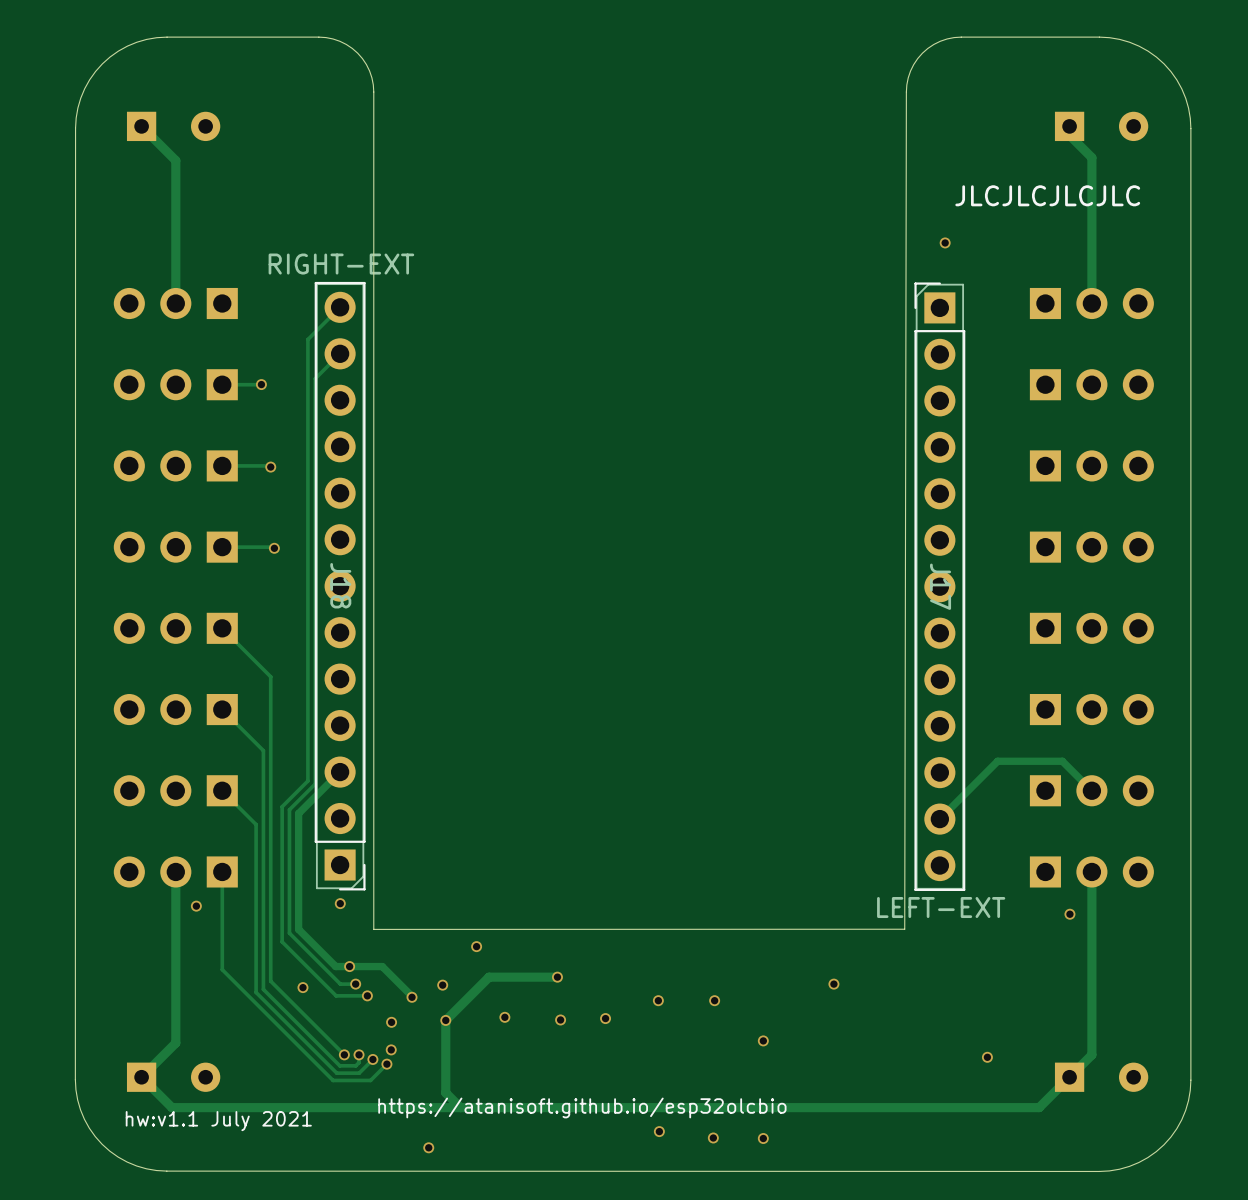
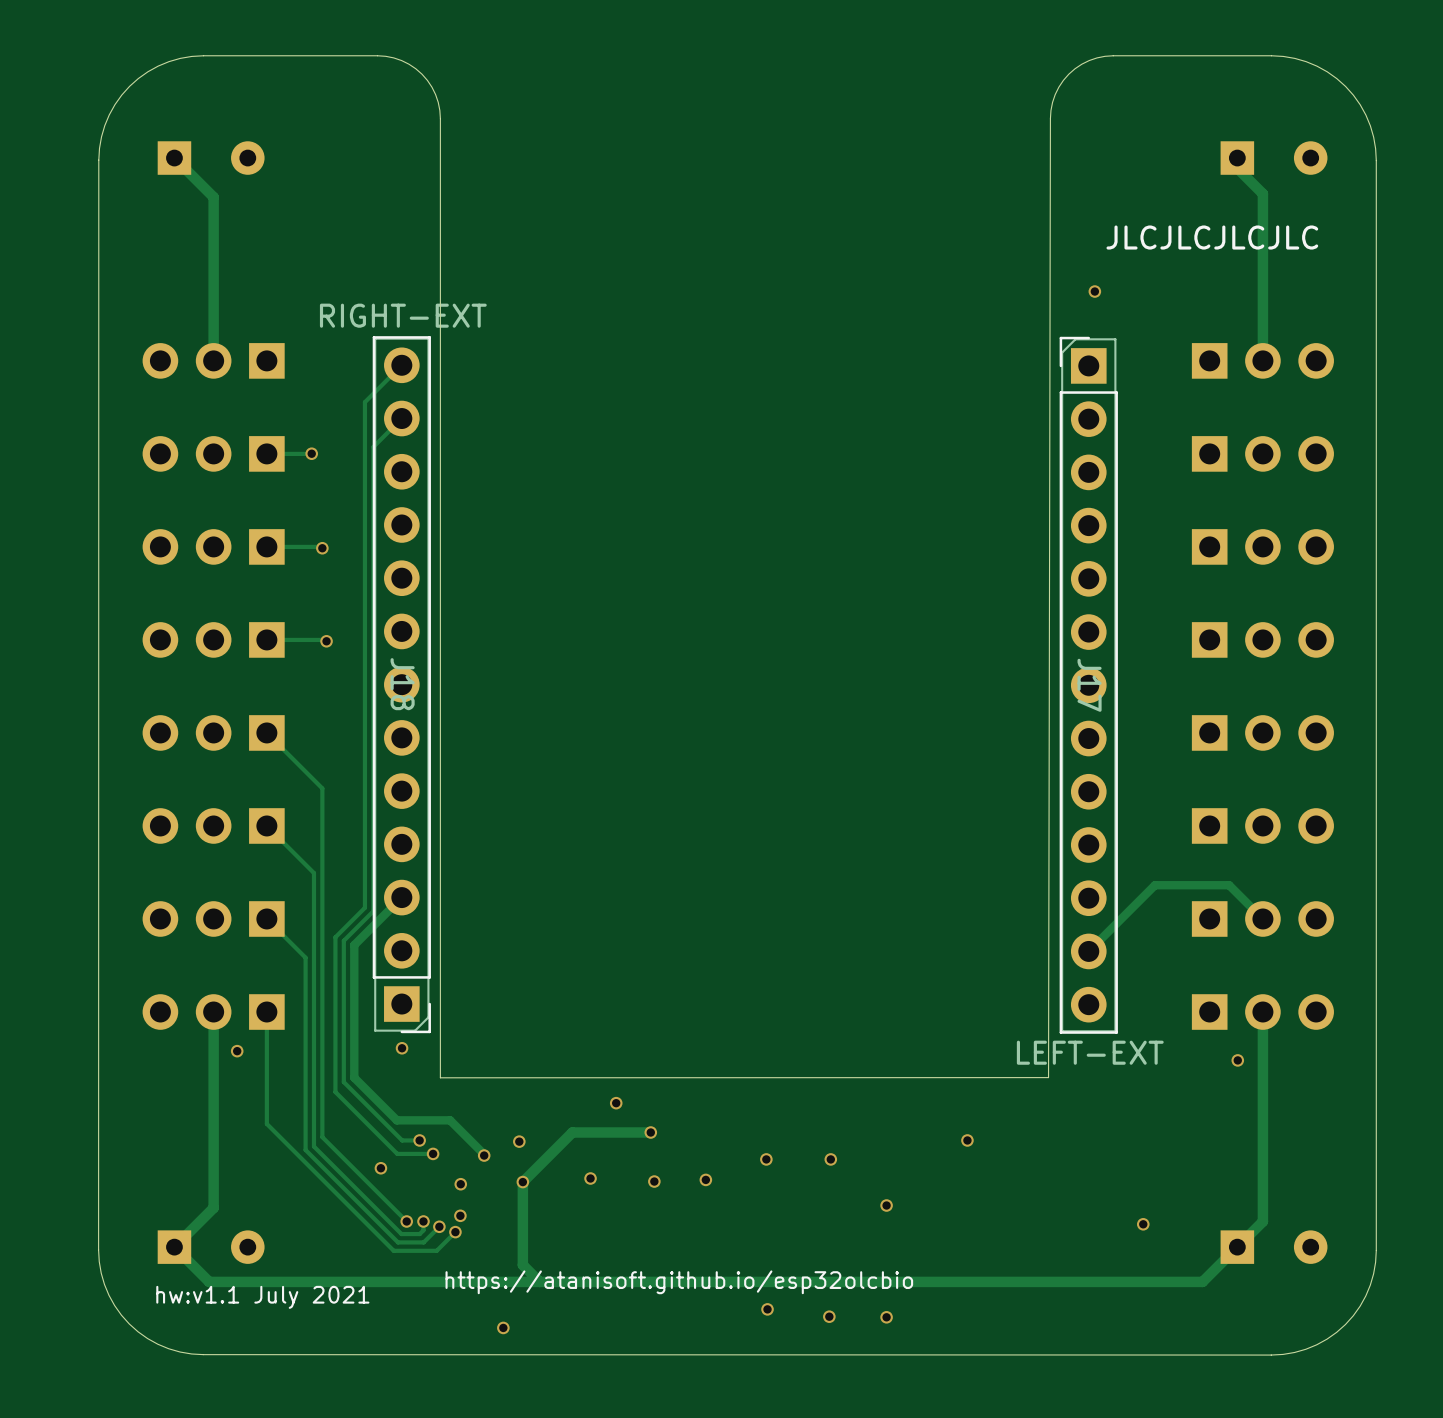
via position: (476, 946) -> (616, 1103)
via: (349, 966) -> none
via: (302, 987) -> none
via: none -> (380, 1168)

